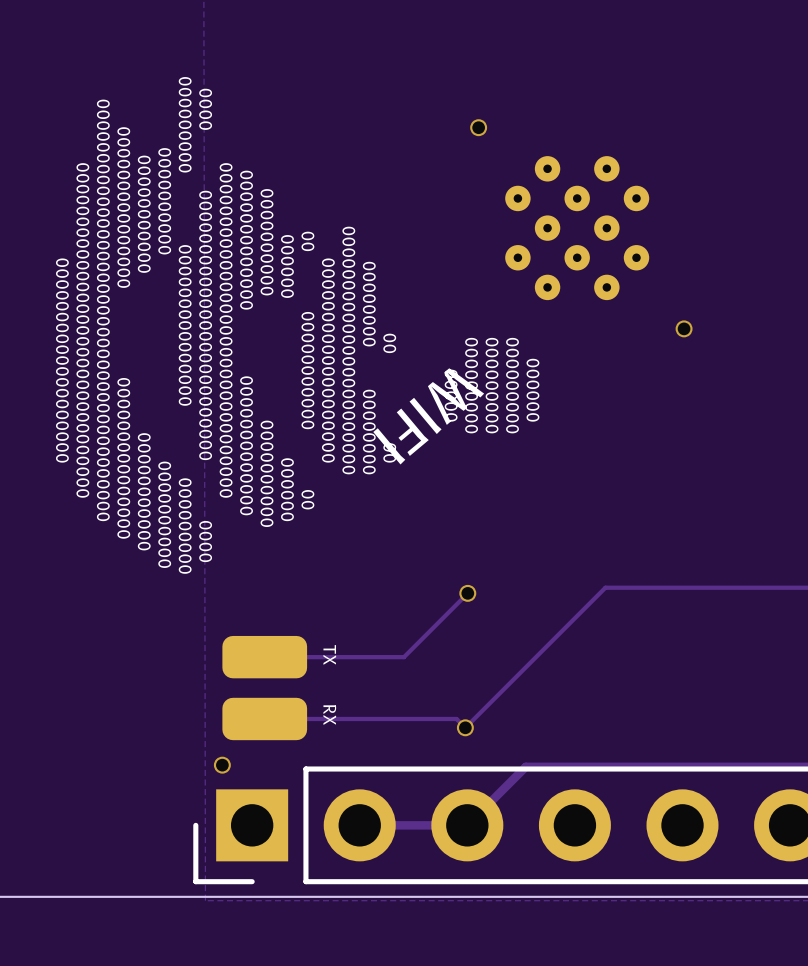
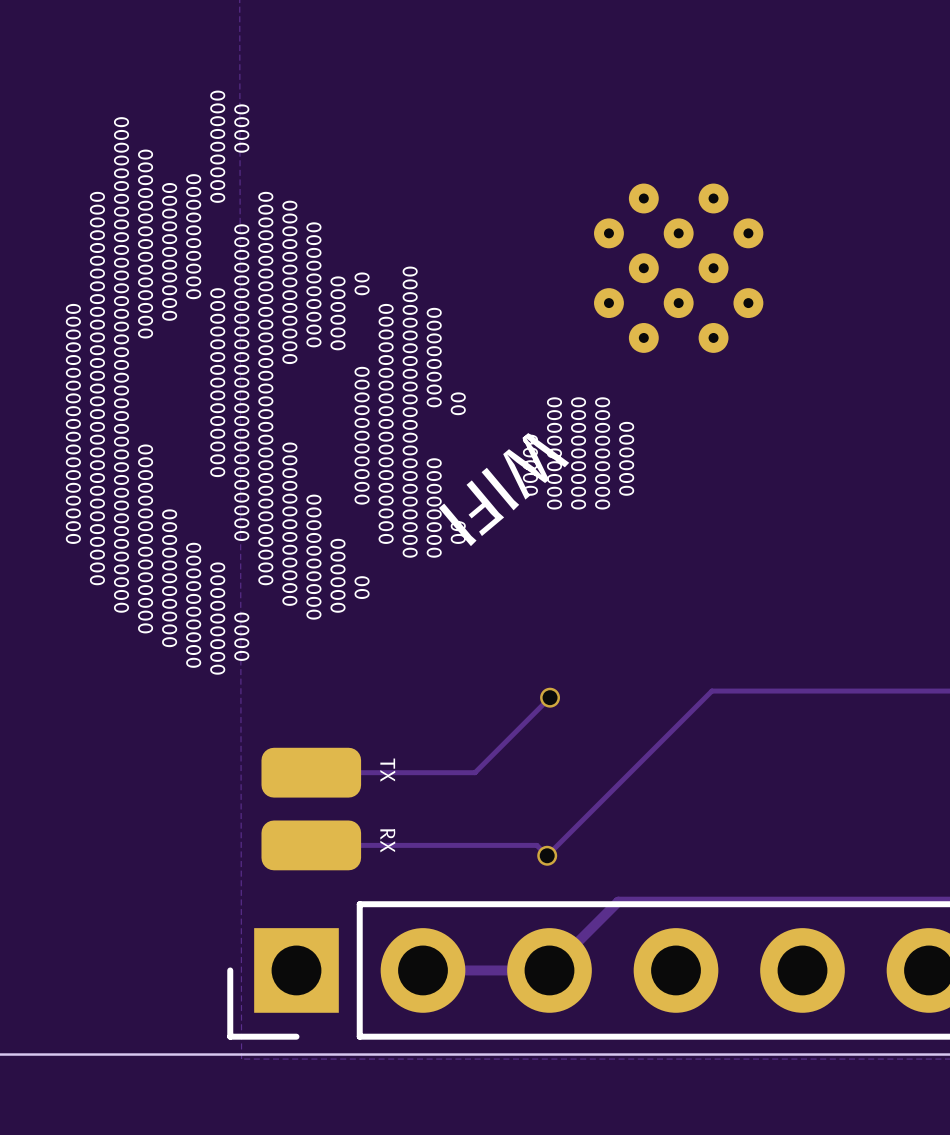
via: (478, 127) -> none
via: (684, 328) -> none
via: (222, 765) -> none

